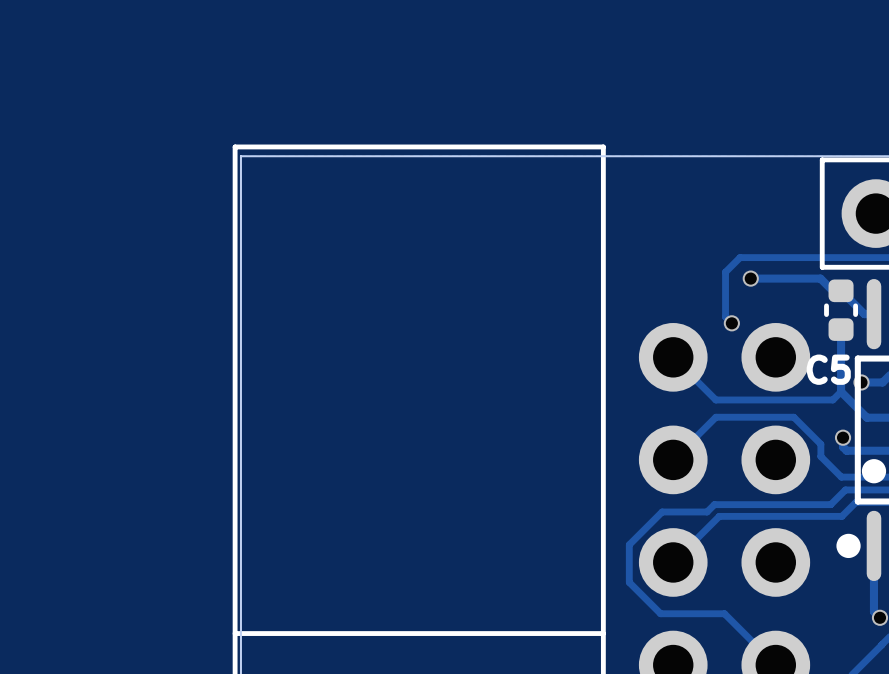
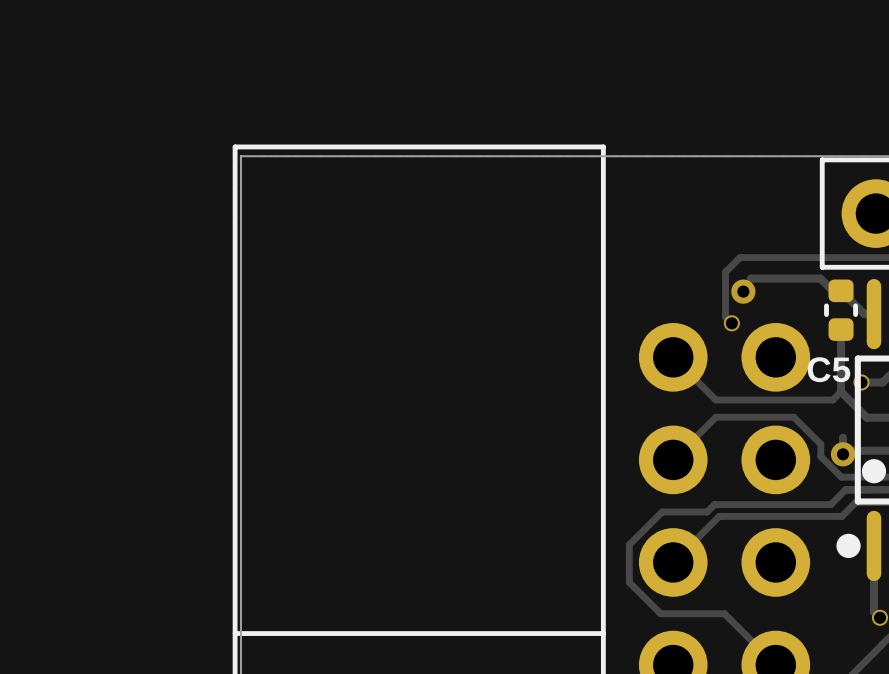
via size: [742, 270, 759, 287] -> [731, 279, 756, 304]
via position: (843, 437) -> (843, 454)

